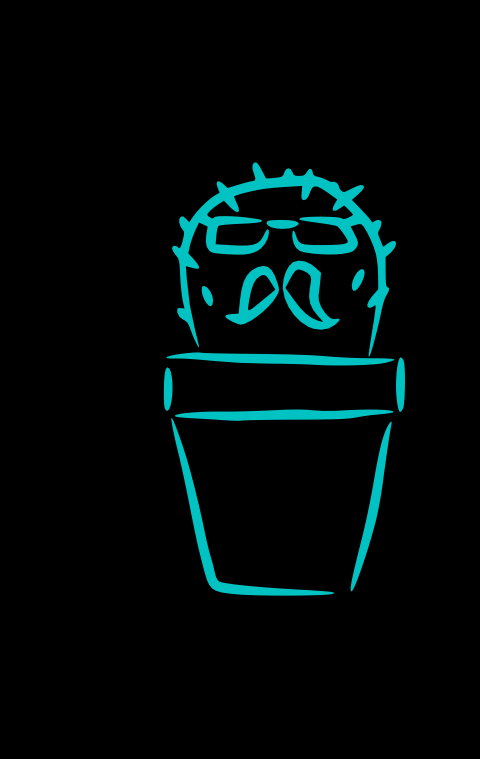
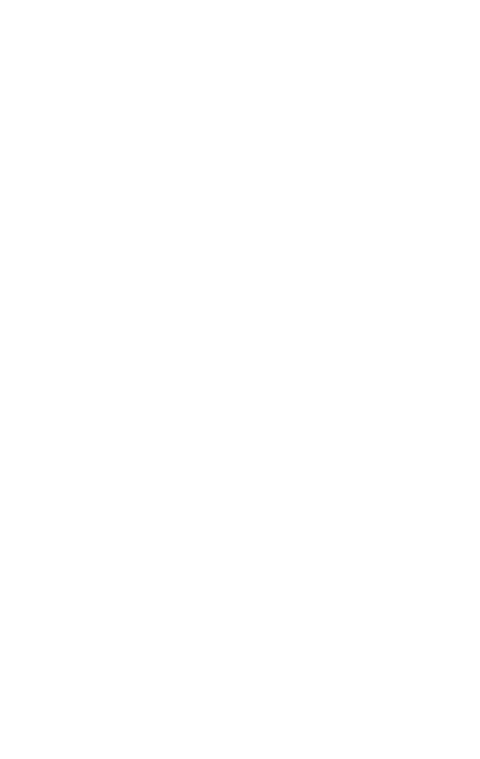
drawing: [163, 162, 405, 596] -> none

